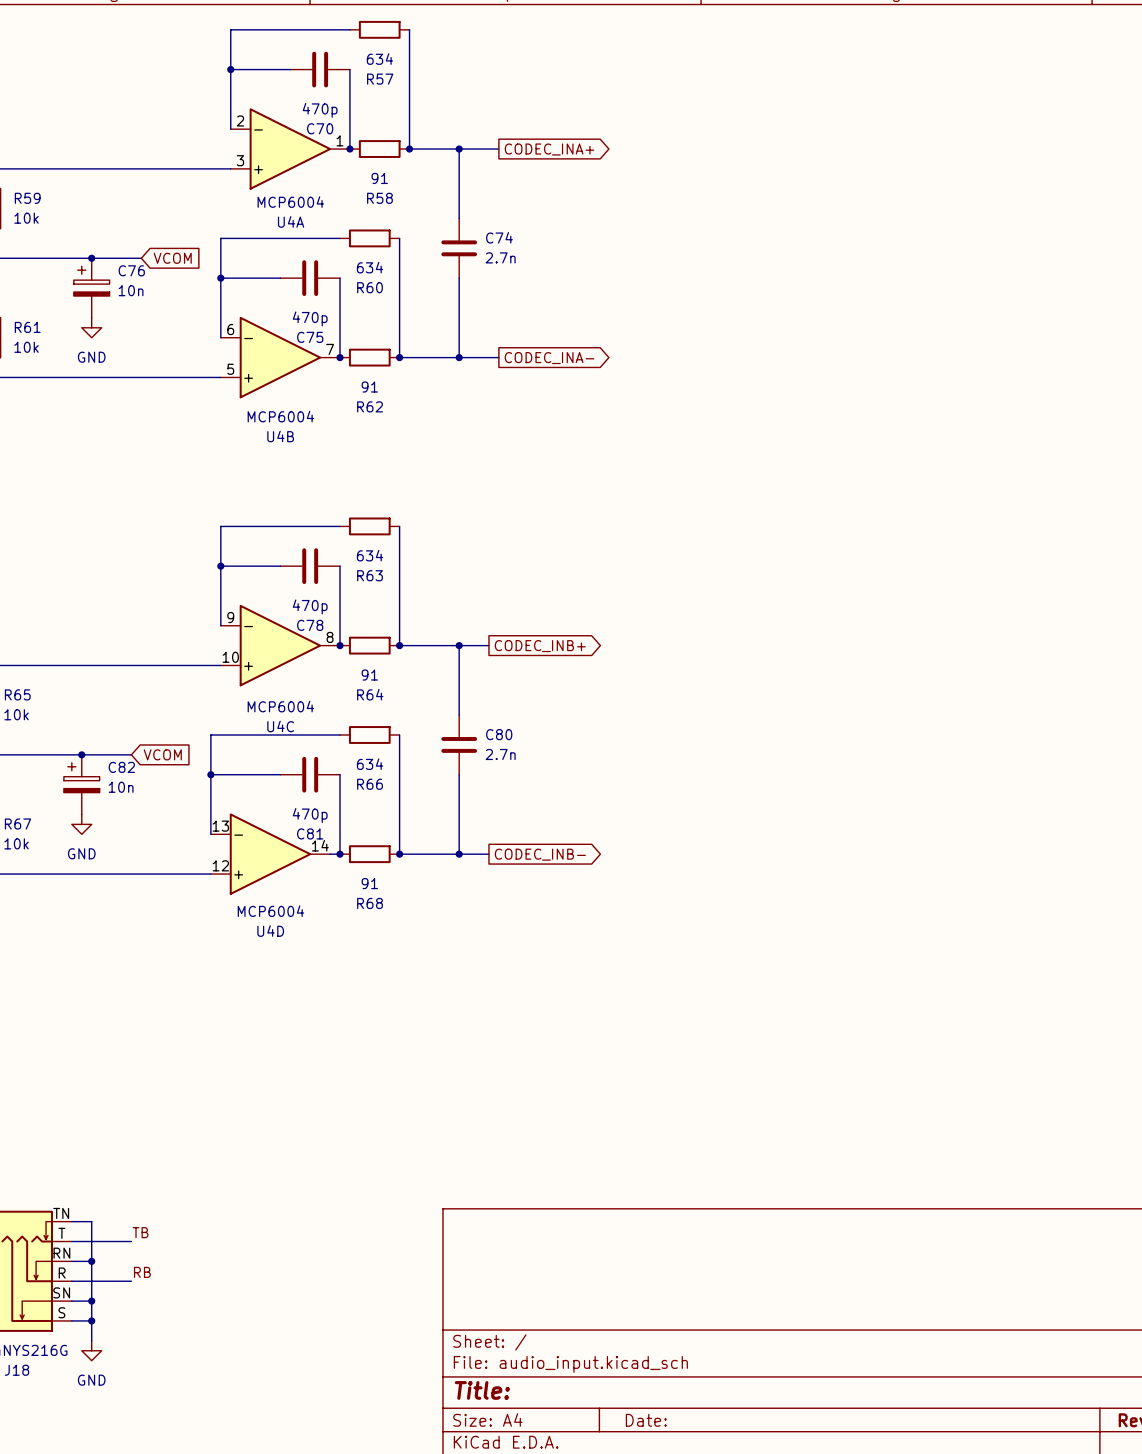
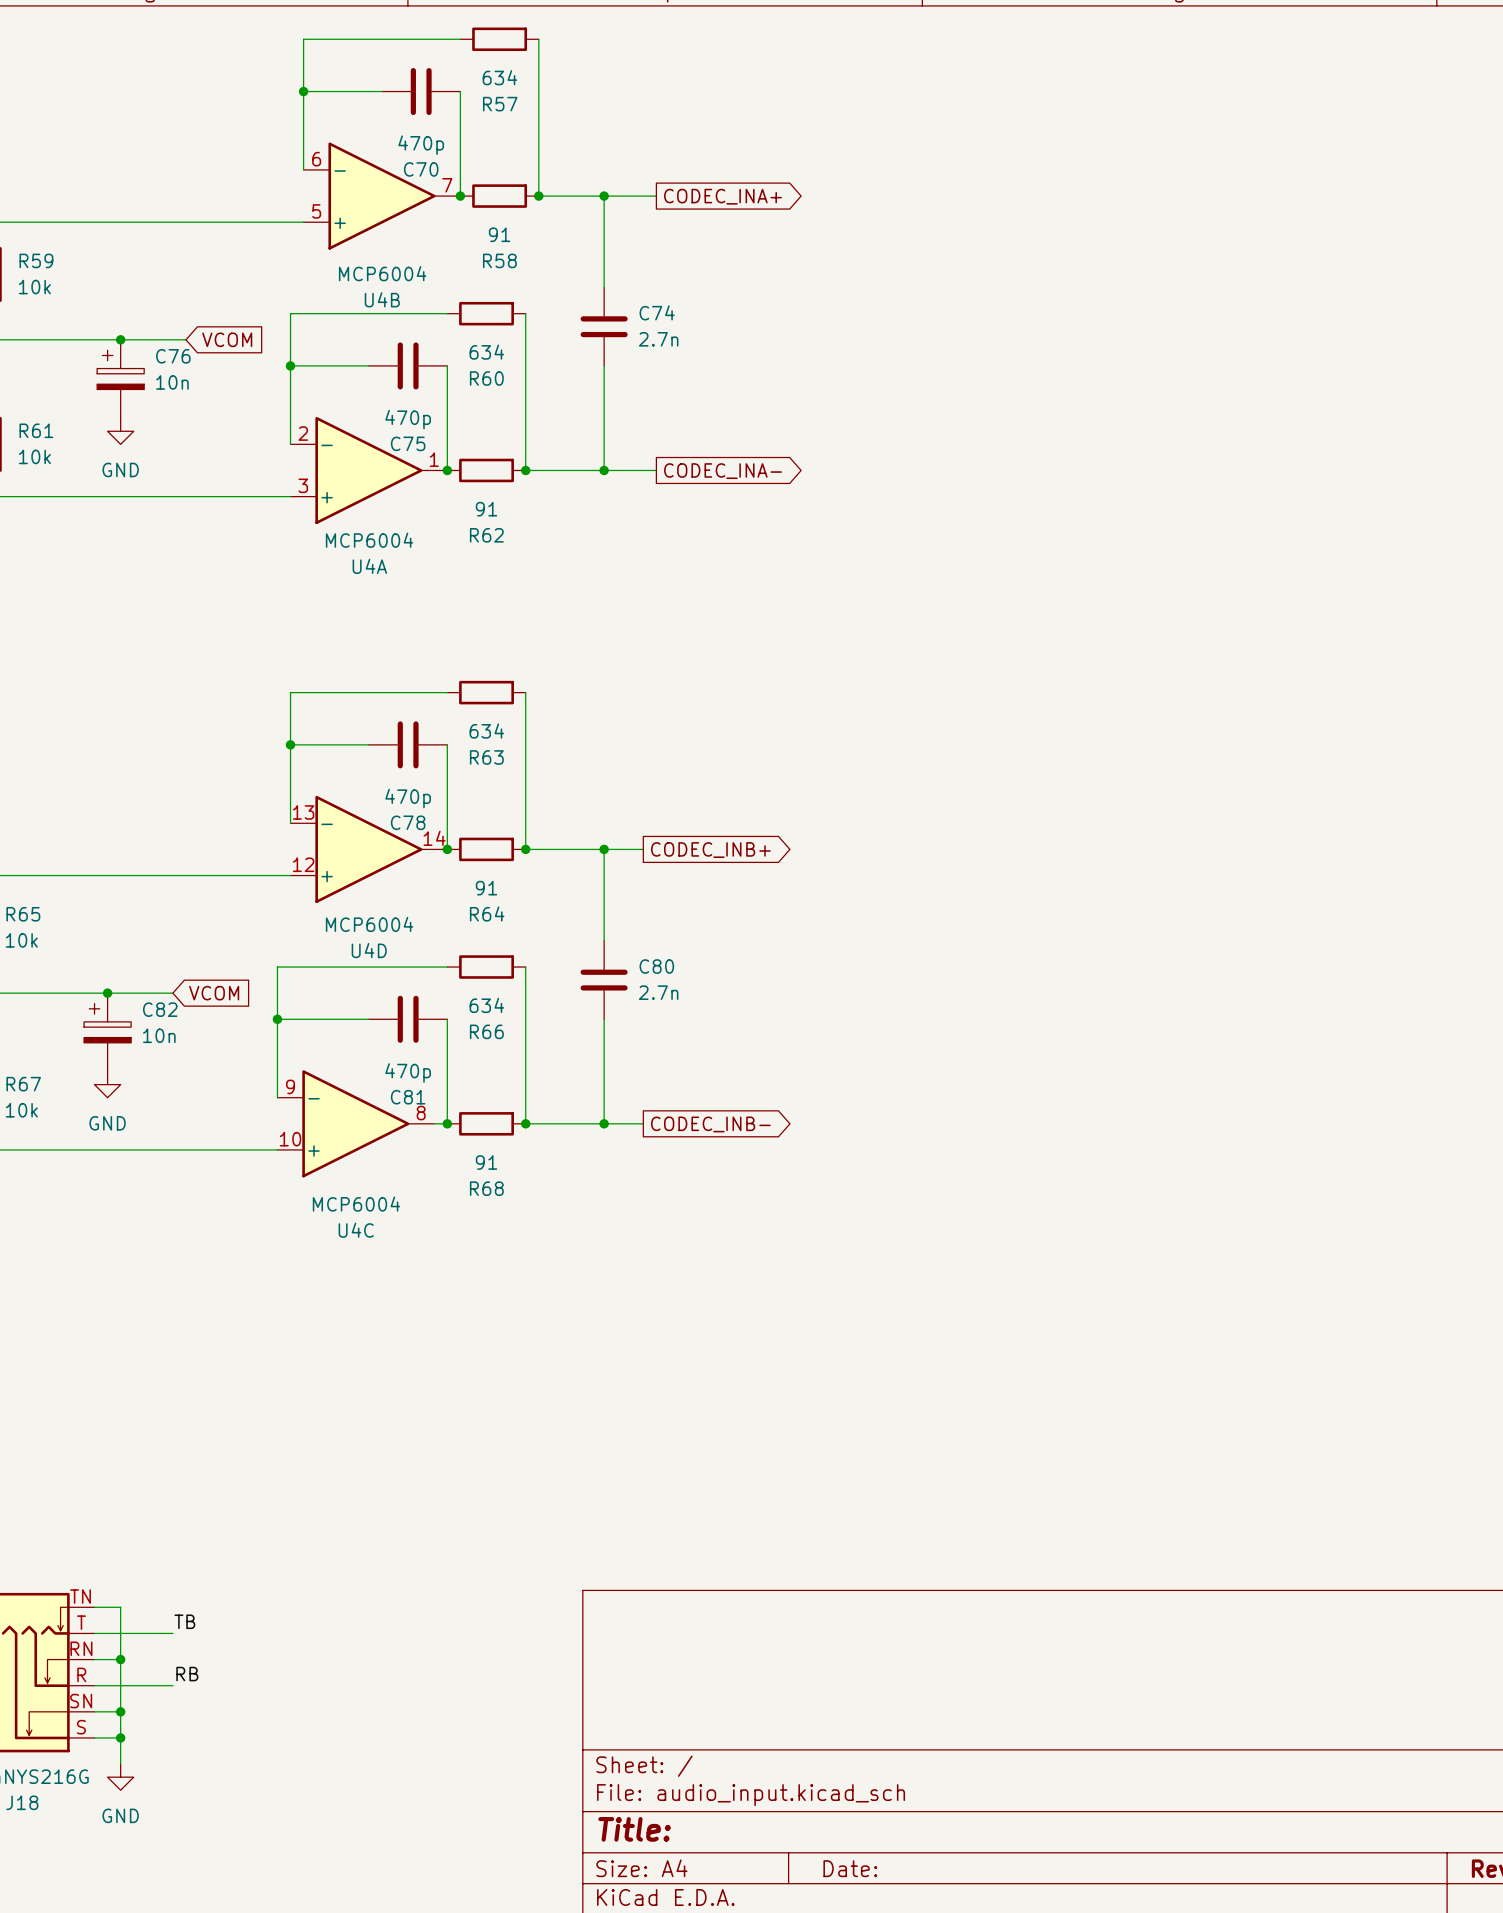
U4A position: (290, 149) -> (368, 470)
U4B position: (280, 357) -> (381, 196)
U4C position: (280, 645) -> (355, 1123)
U4D position: (270, 854) -> (368, 849)

